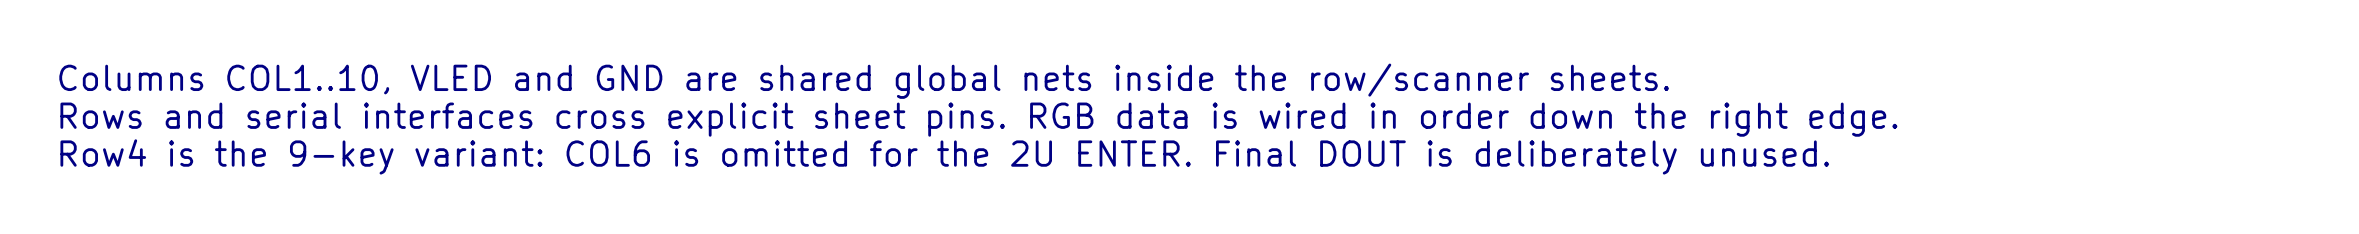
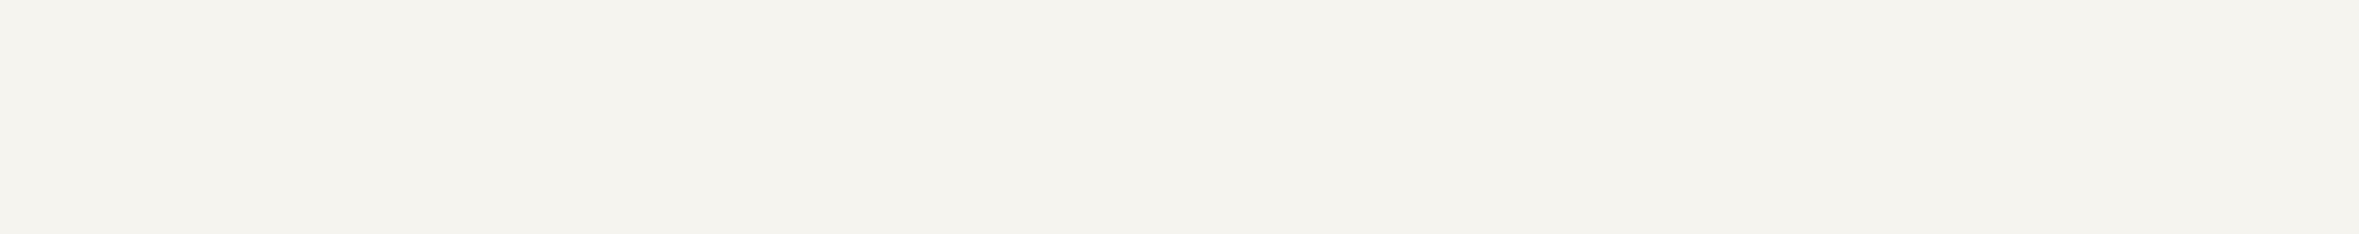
text: Columns COL1..10, VLED and GND are shared global nets inside the row/scanner sheets. (864, 81) -> none
text: Rows and serial interfaces cross explicit sheet pins. RGB data is wired in order down the right edge. (978, 119) -> none
text: Row4 is the 9-key variant: COL6 is omitted for the 2U ENTER. Final DOUT is deliberately unused. (944, 156) -> none

